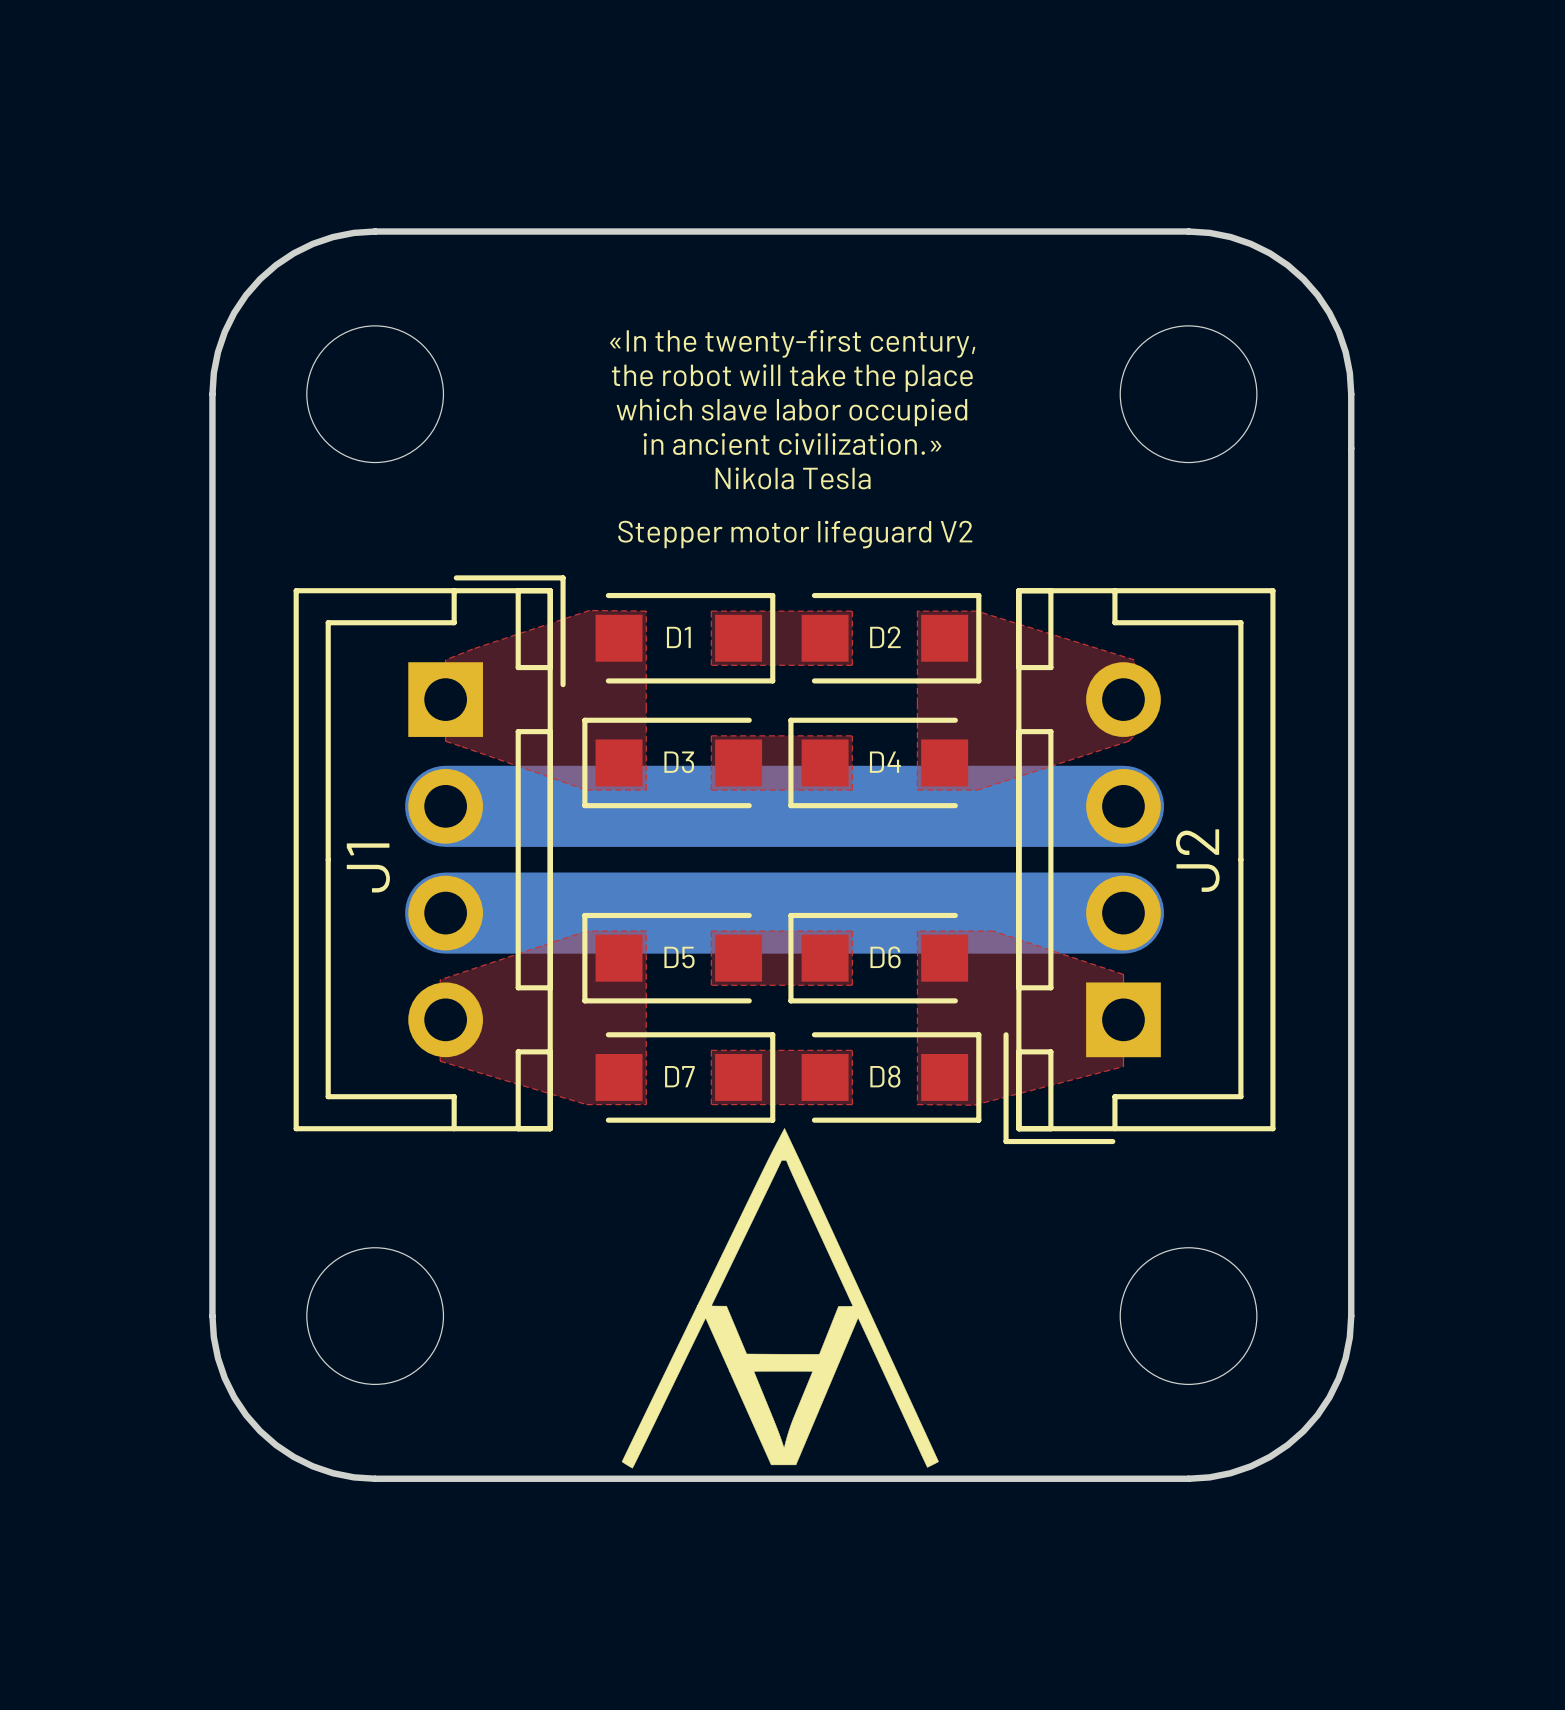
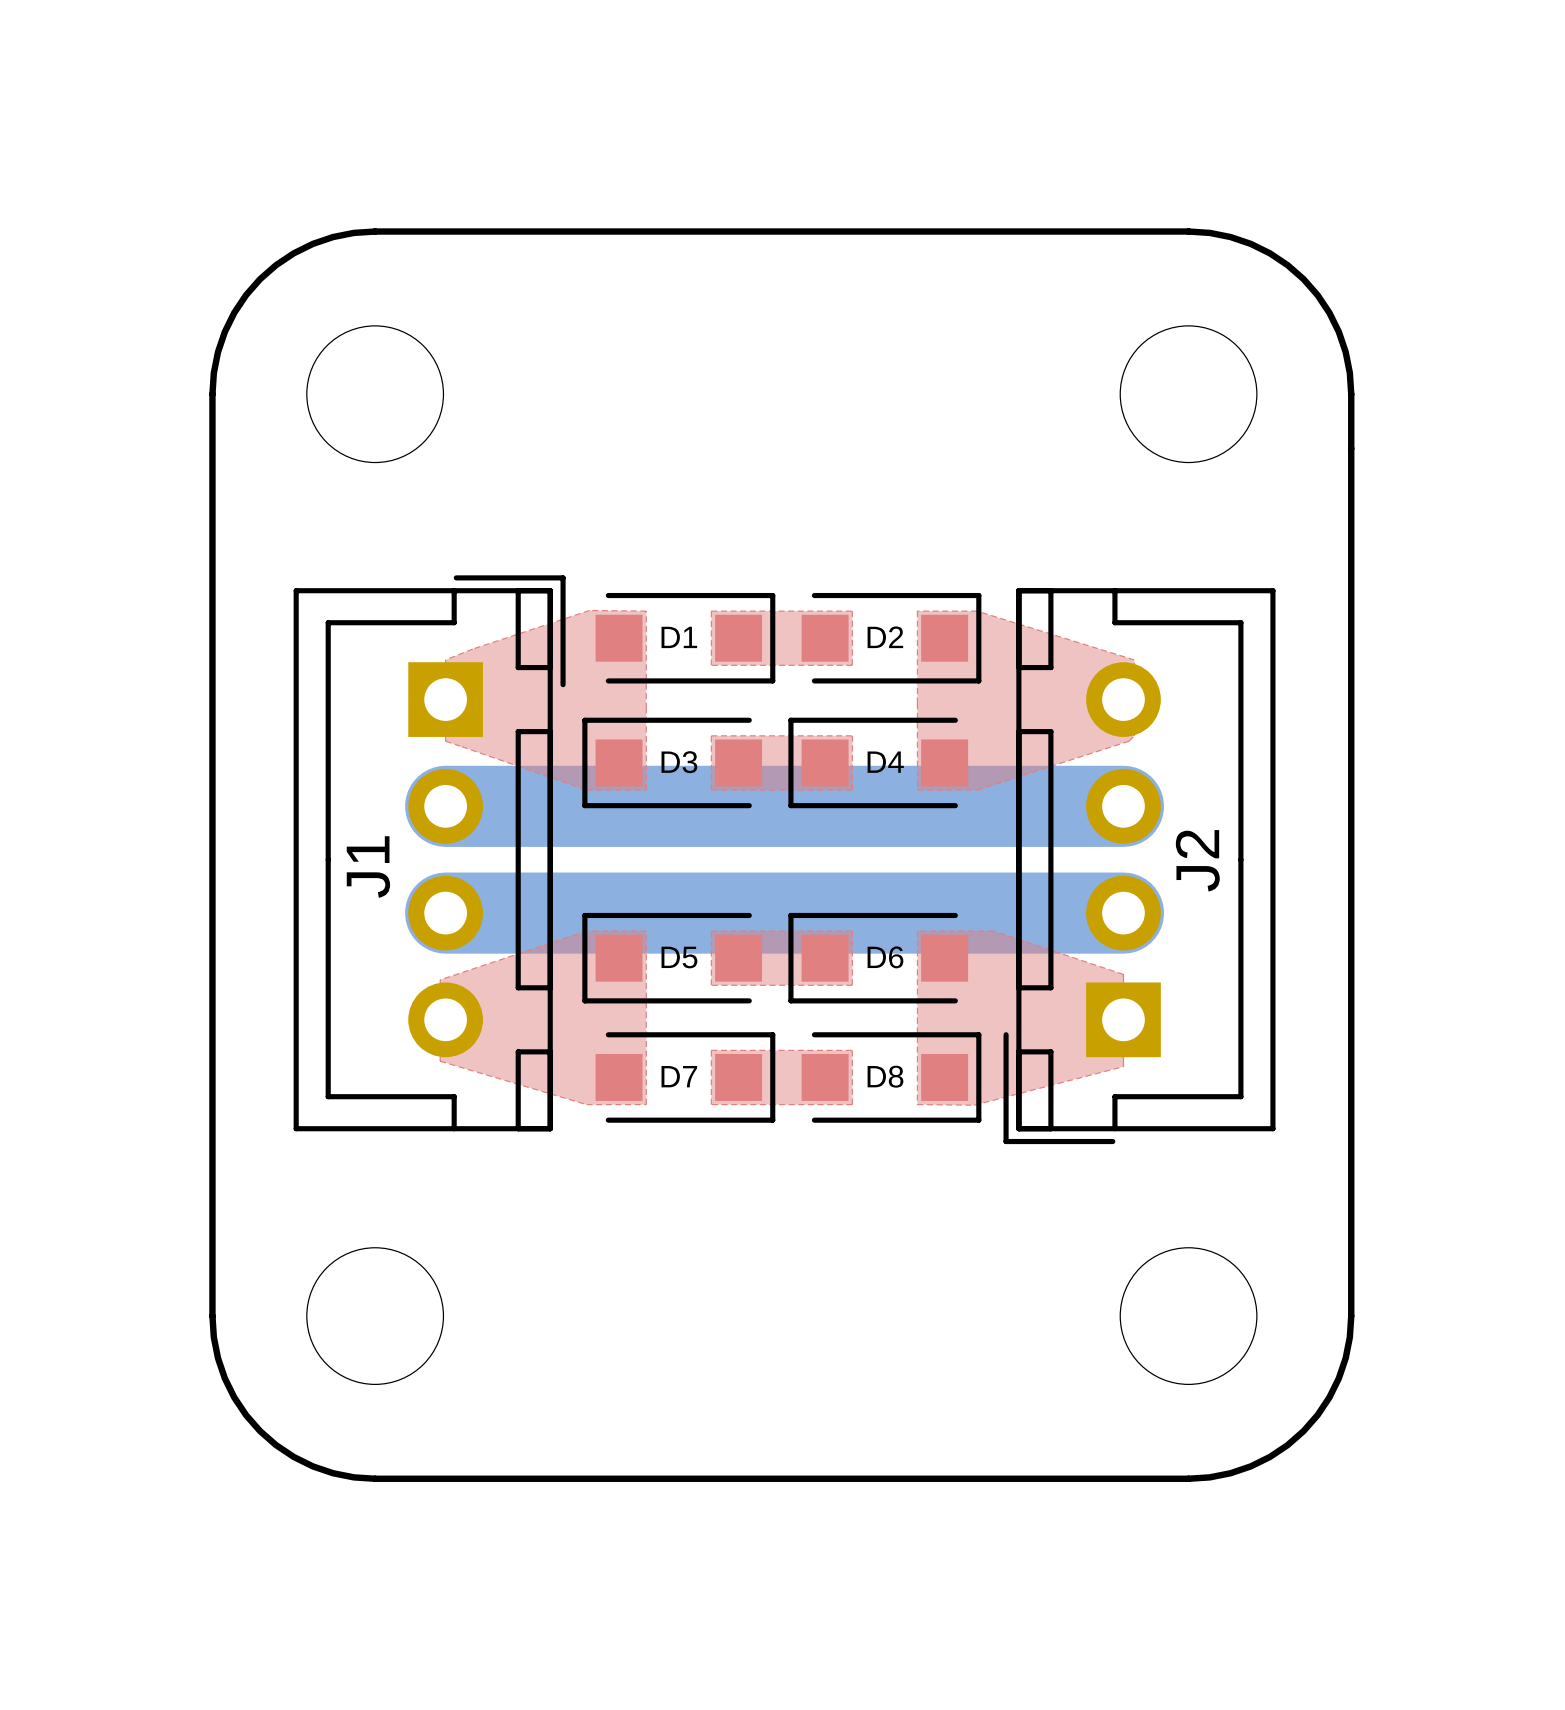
text: «In the twenty-first century, (792, 343) -> none
text: the robot will take the place (792, 378) -> none
text: which slave labor occupied (791, 412) -> none
text: in ancient civilization.» (792, 444) -> none
text: Nikola Tesla (793, 478) -> none
text: Stepper motor lifeguard V2 (795, 534) -> none
drawing: [621, 1128, 939, 1469] -> none

